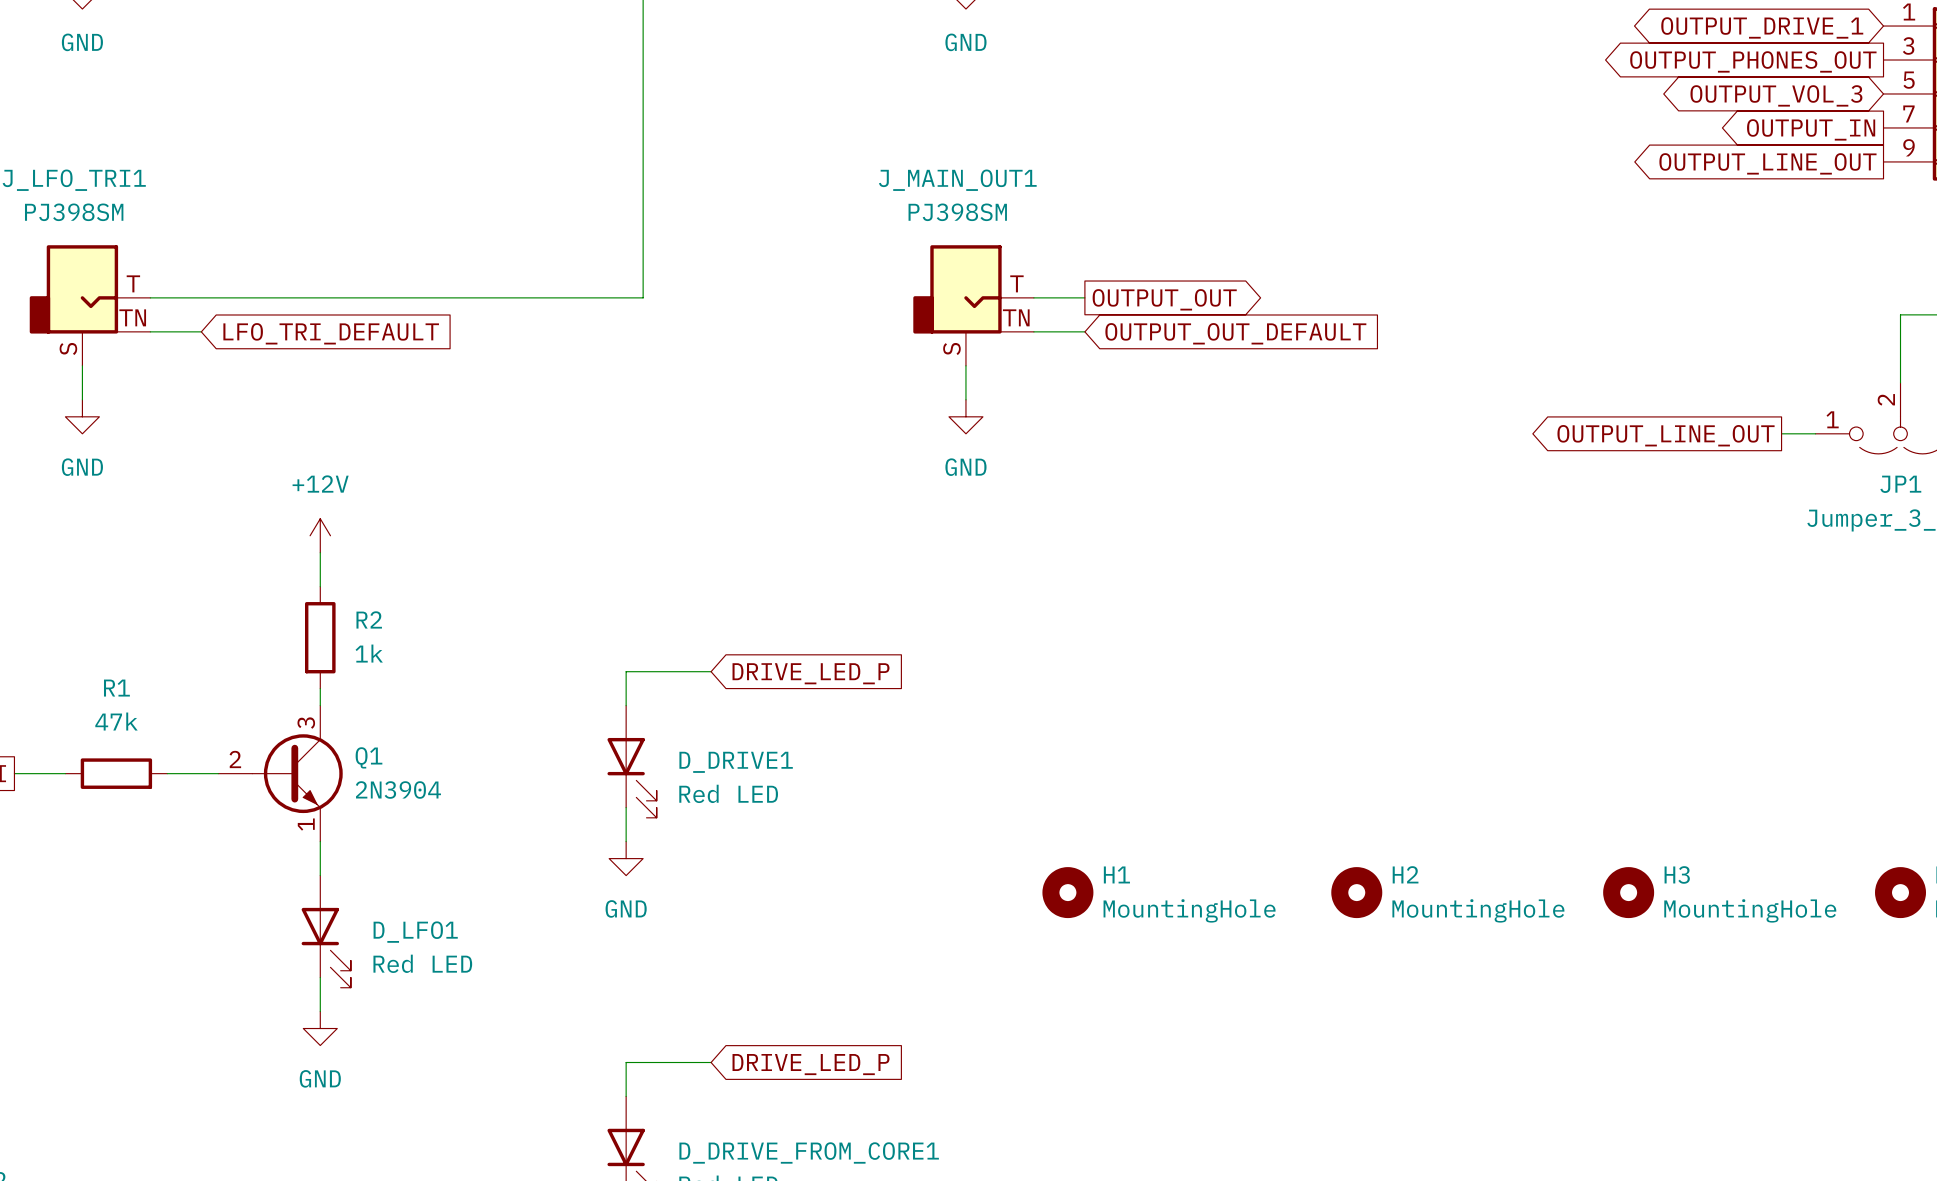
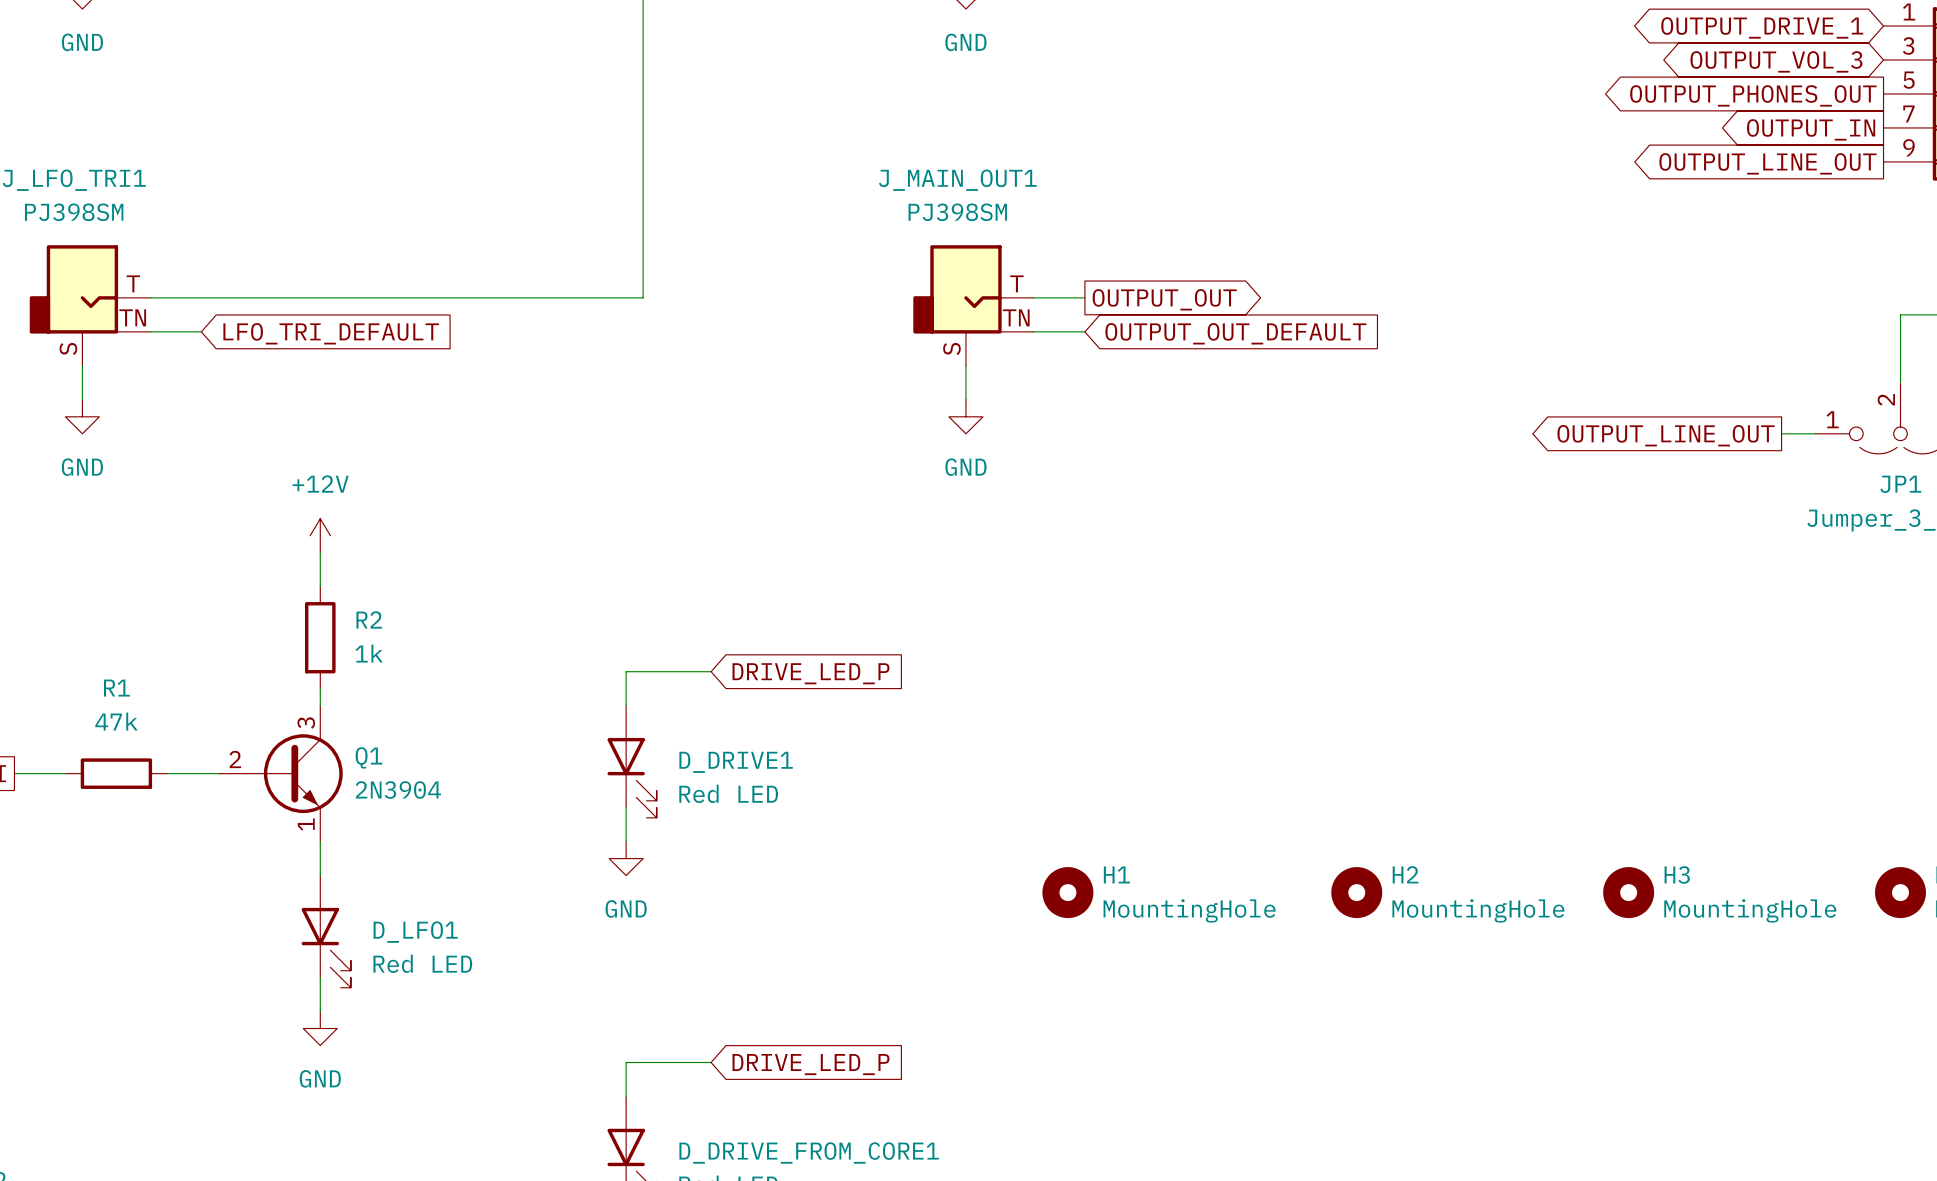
global label shape: output (1753, 61) -> bidirectional (1776, 61)
global label: OUTPUT_PHONES_OUT (1753, 61) -> OUTPUT_VOL_3 (1776, 61)
global label shape: bidirectional (1776, 95) -> output (1753, 95)
global label: OUTPUT_VOL_3 (1776, 95) -> OUTPUT_PHONES_OUT (1753, 95)

